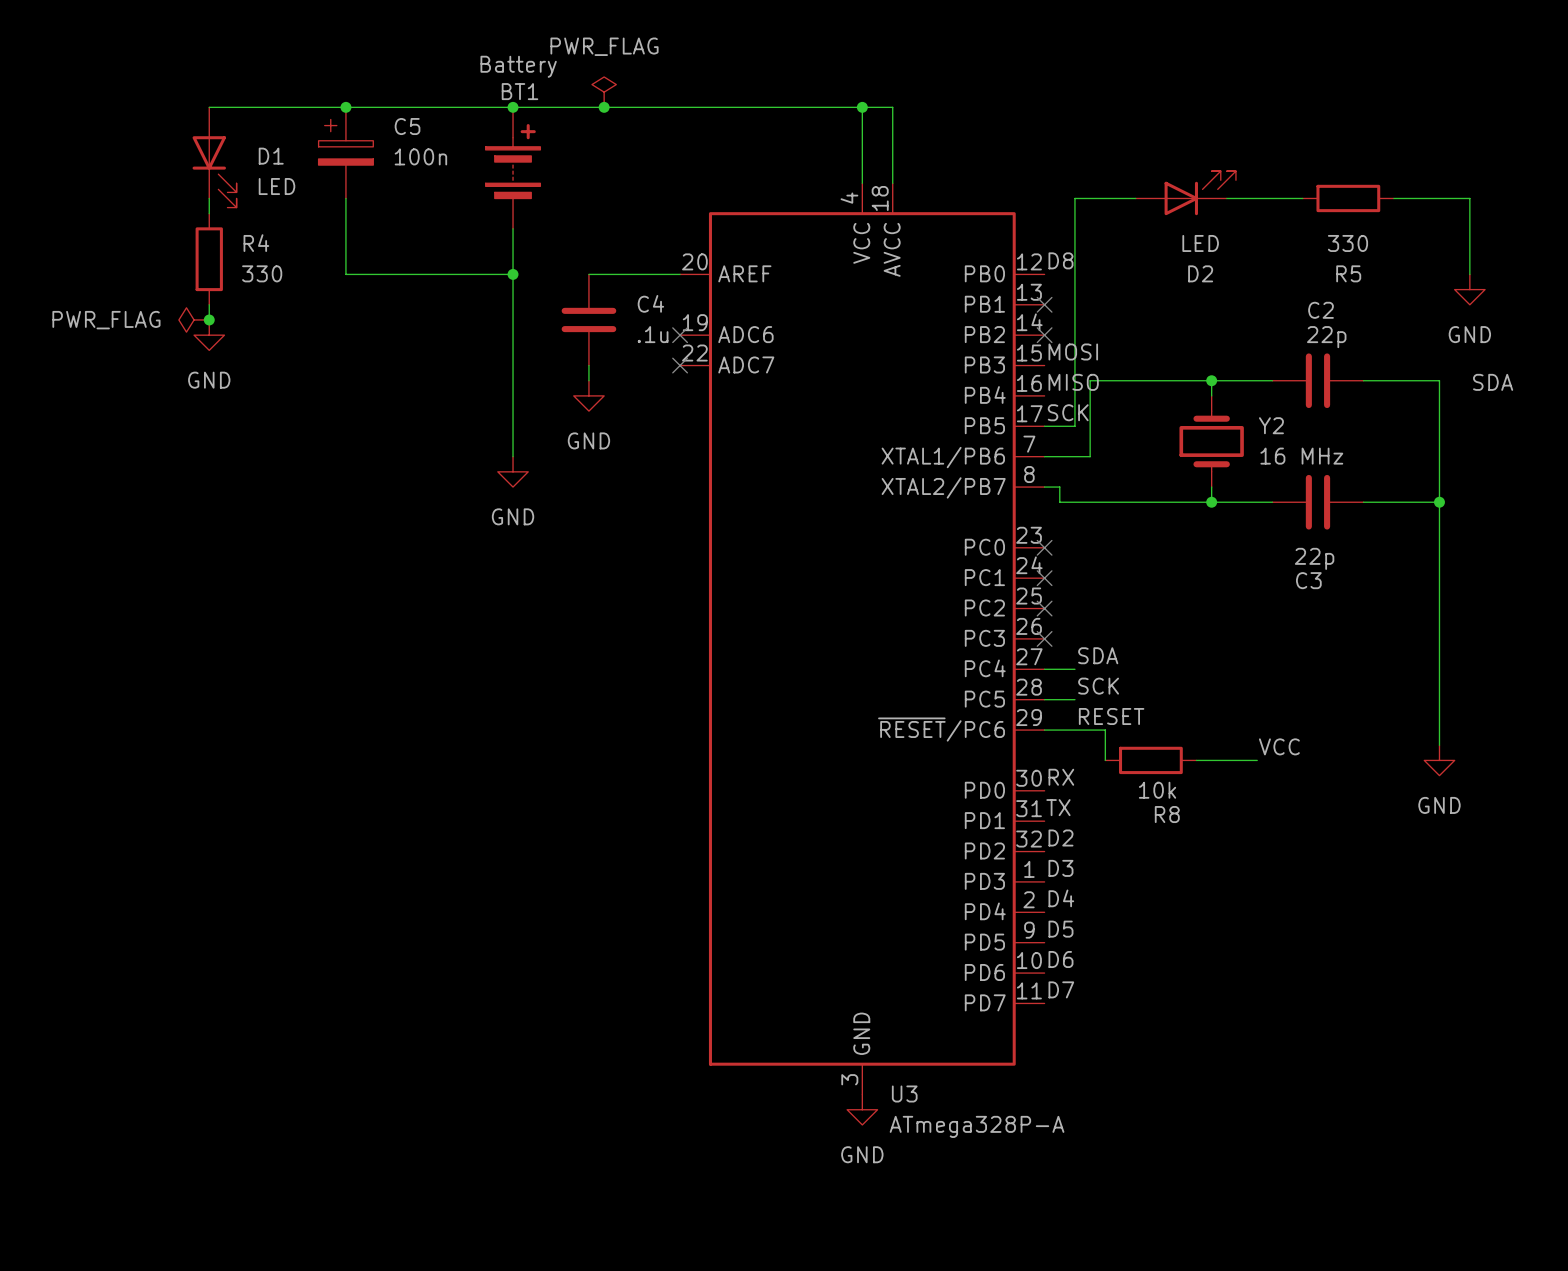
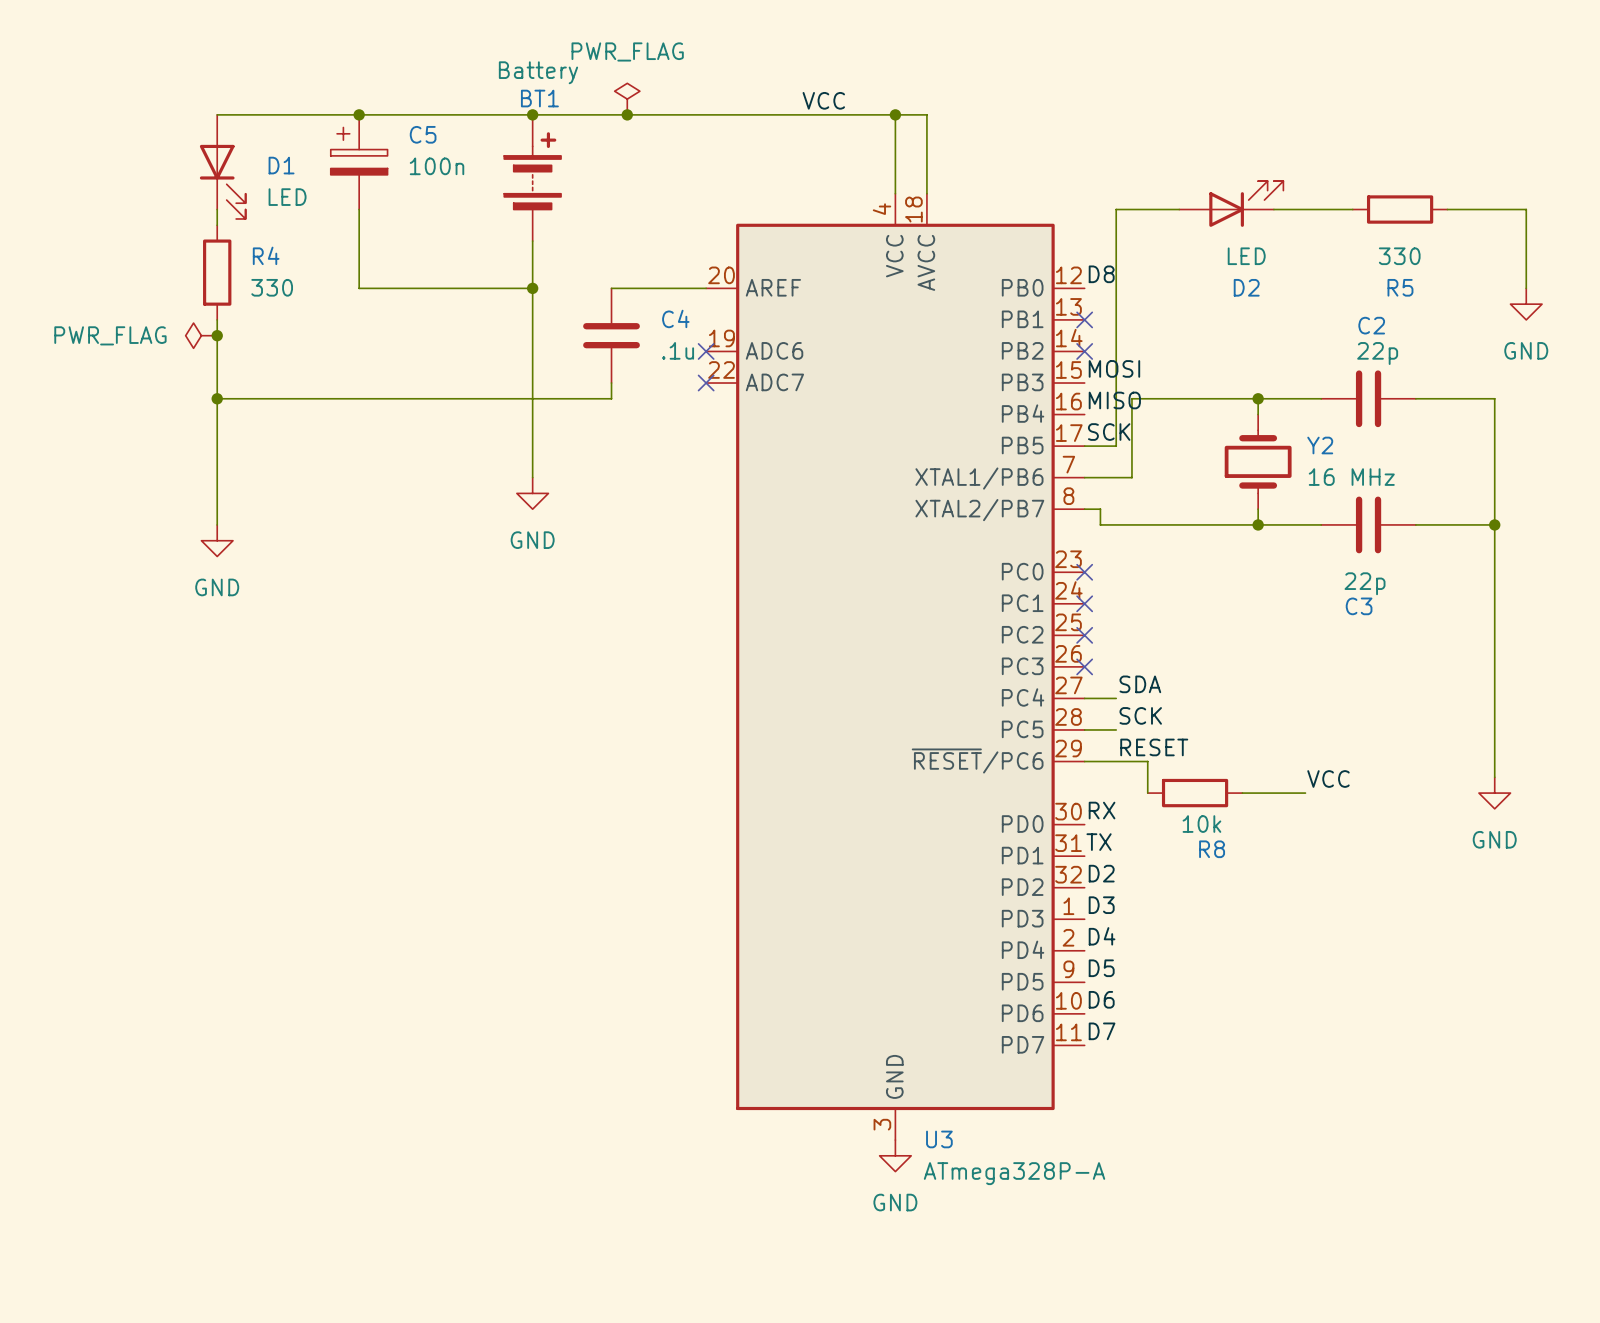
label: none -> VCC (823, 100)
wire: none -> (217, 335) (217, 524)
power symbol position: GND (209, 335) -> GND (217, 540)
wire: none -> (217, 398) (611, 398)
junction: none -> (217, 398)
label: SDA (1493, 382) -> none
power symbol: GND (588, 395) -> none

